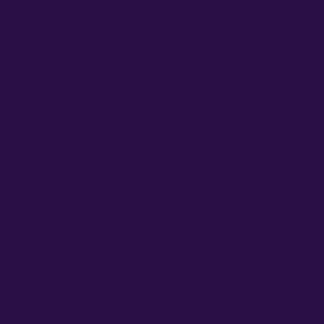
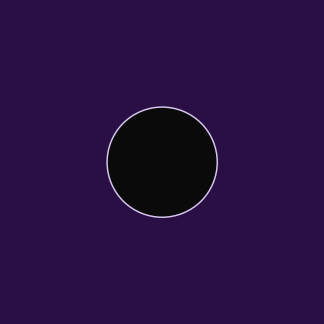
part: none -> (162, 162)

